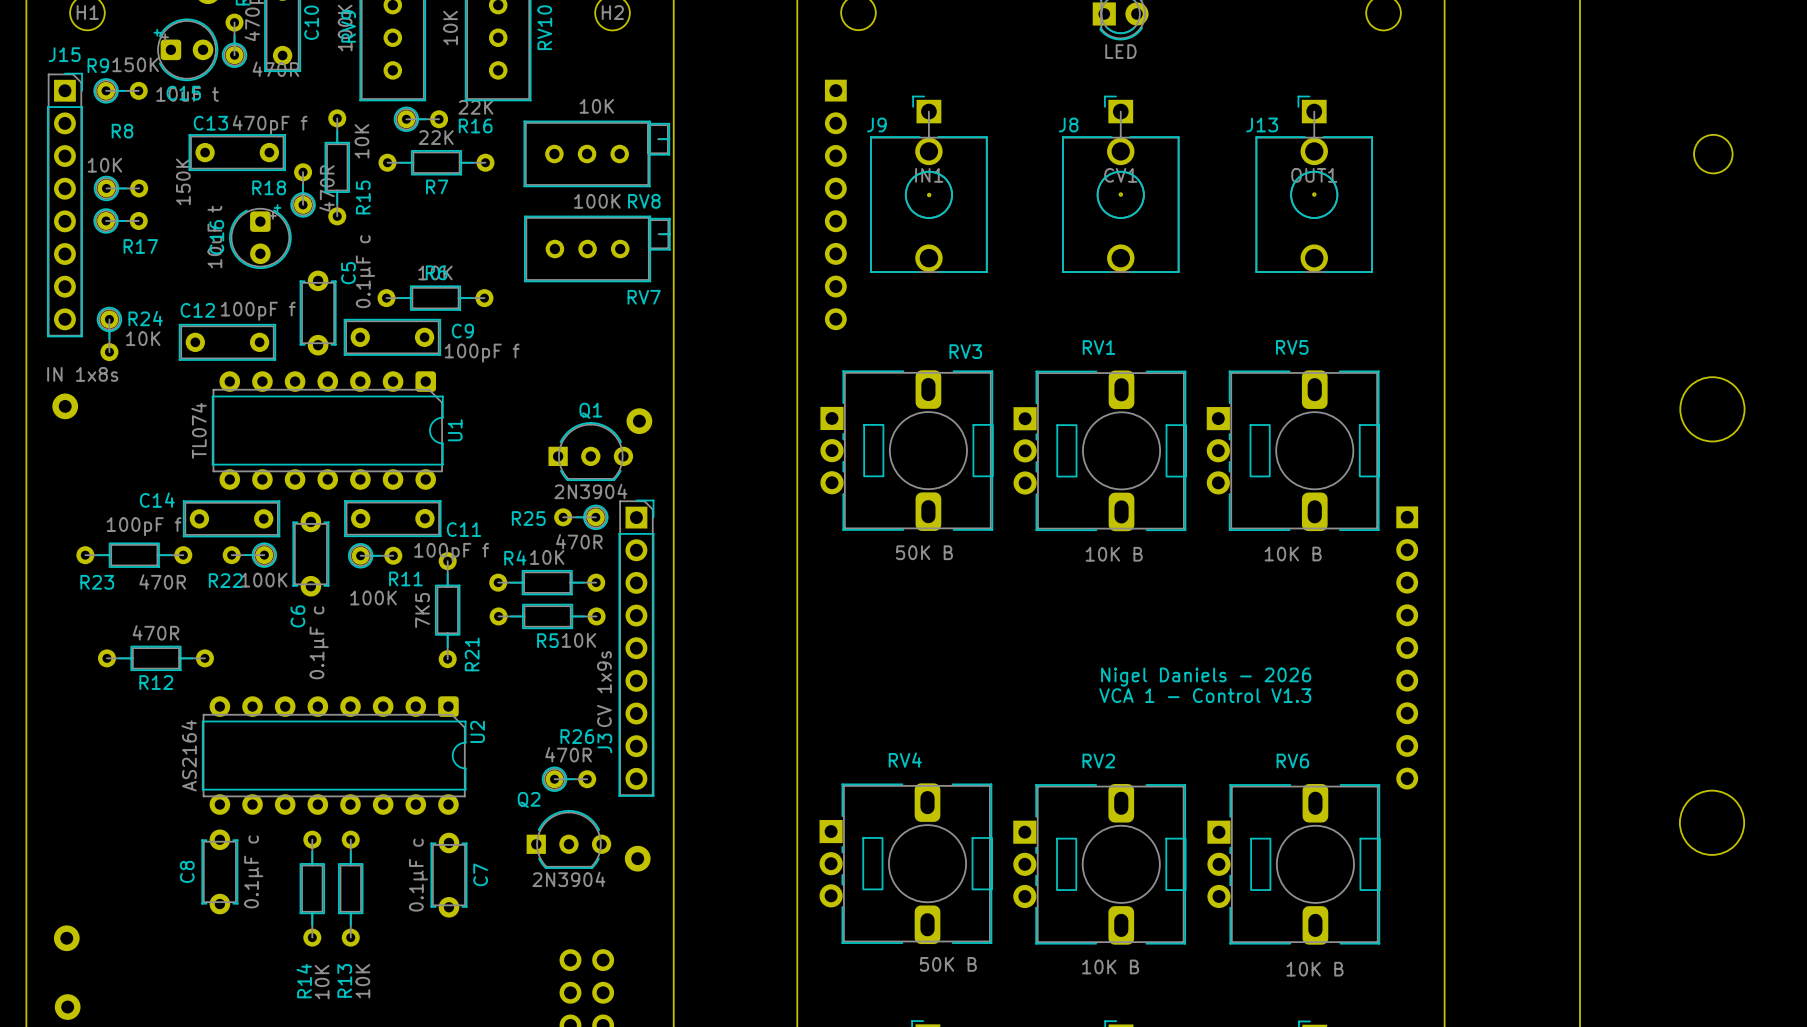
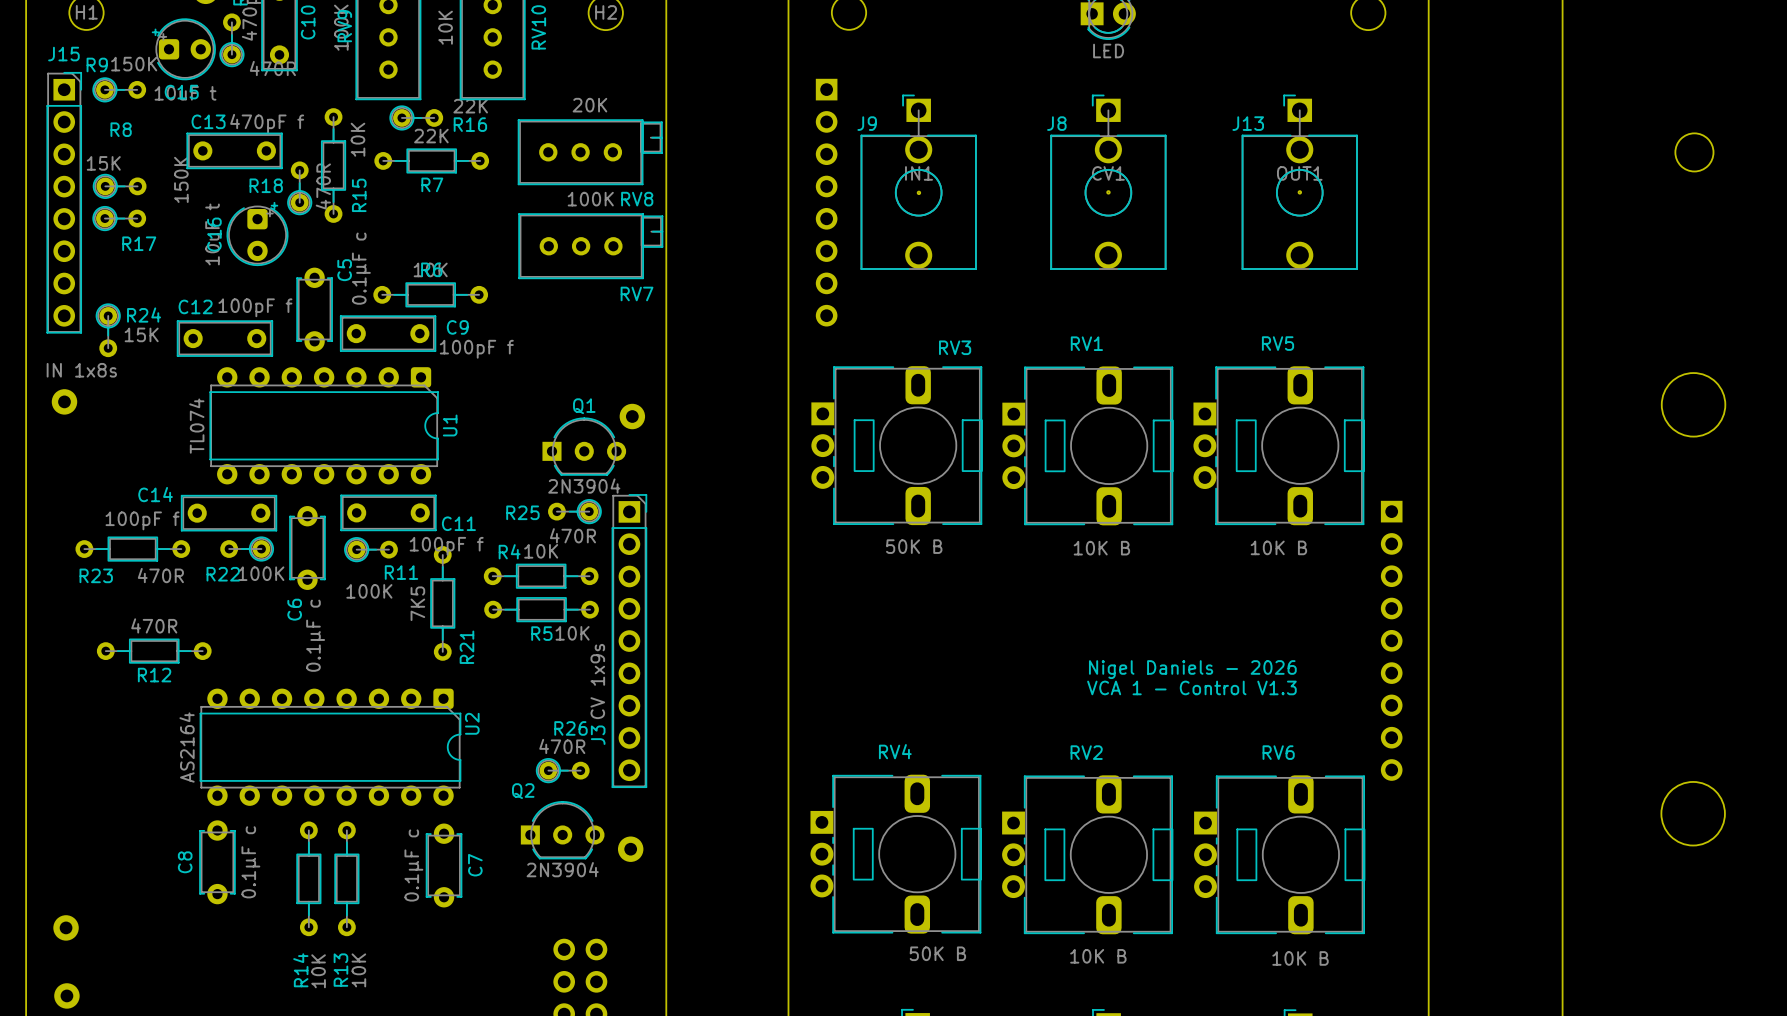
RV8 value: 10K (596, 106) -> 20K (589, 105)
R8 value: 10K (104, 165) -> 15K (103, 163)
R24 value: 10K (143, 338) -> 15K (141, 334)

